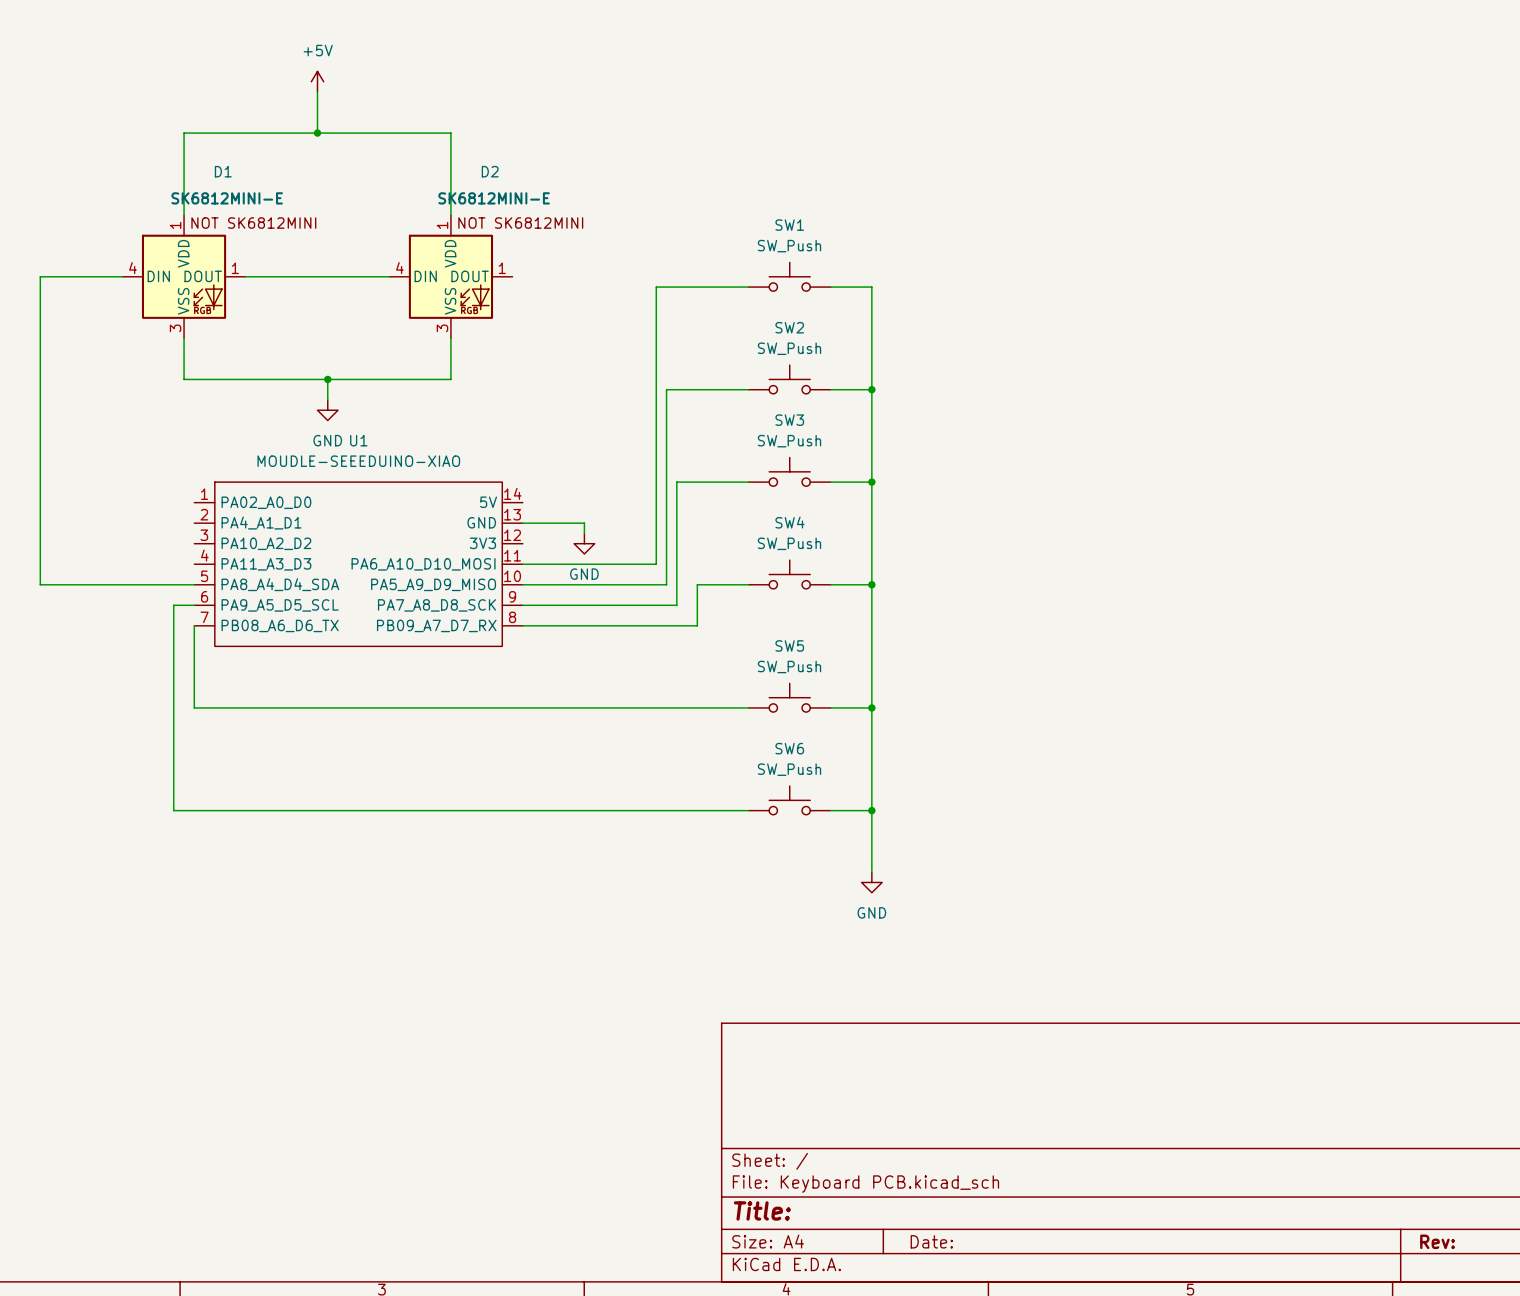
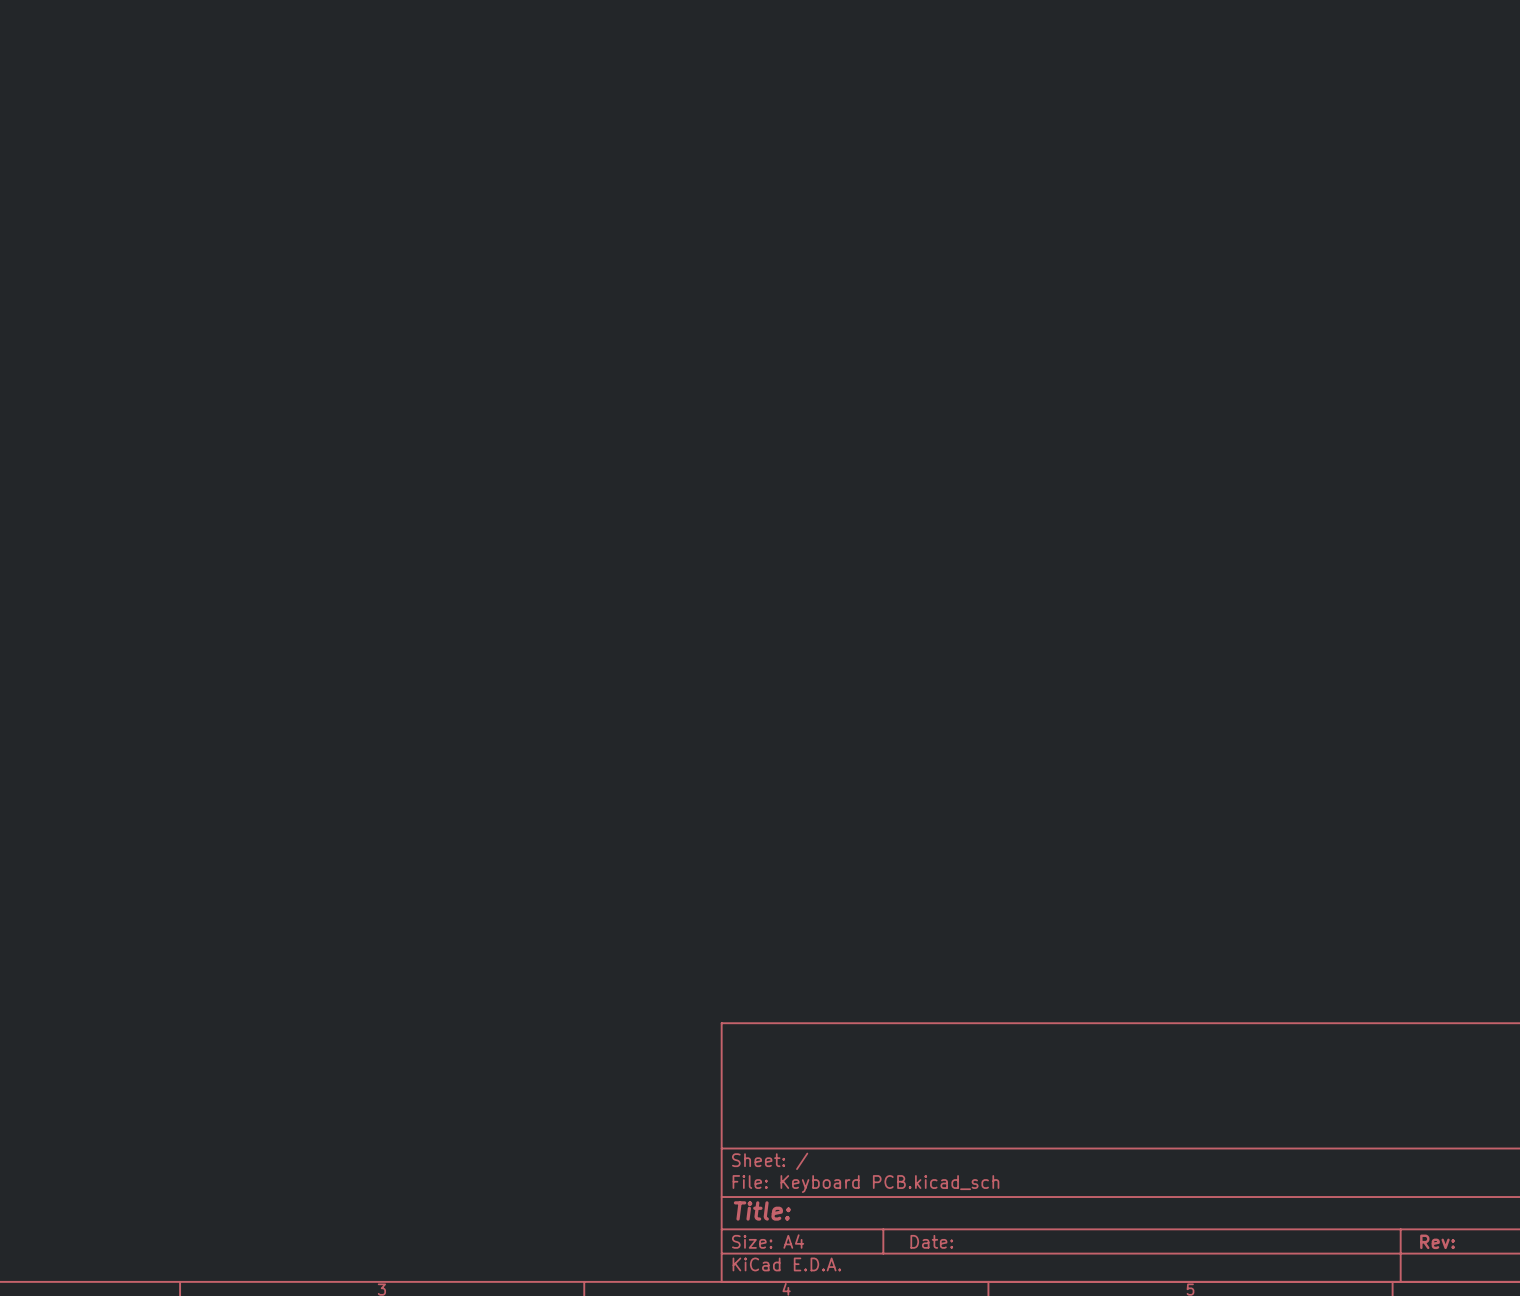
power symbol: +5V (317, 81) -> none
wire: (317, 92) (317, 133) -> none
junction: (317, 133) -> none
wire: (184, 215) (184, 133) (450, 133) (450, 215) -> none
wire: (122, 276) (40, 276) (40, 584) (194, 584) -> none
D1: SK6812MINI-E (184, 276) -> none
wire: (245, 276) (389, 276) -> none
D2: SK6812MINI-E (450, 276) -> none
SW1: SW_Push (789, 276) -> none
wire: (748, 287) (656, 287) (656, 564) (522, 564) -> none
wire: (830, 287) (871, 287) (871, 872) -> none
wire: (184, 338) (184, 379) (450, 379) (450, 338) -> none
wire: (327, 379) (327, 399) -> none
junction: (327, 379) -> none
SW2: SW_Push (789, 379) -> none
wire: (748, 389) (666, 389) (666, 584) (522, 584) -> none
wire: (830, 389) (871, 389) -> none
junction: (871, 389) -> none
power symbol: GND (327, 410) -> none
SW3: SW_Push (789, 471) -> none
wire: (748, 482) (676, 482) (676, 605) (522, 605) -> none
wire: (830, 482) (871, 482) -> none
junction: (871, 482) -> none
wire: (522, 523) (584, 523) (584, 533) -> none
power symbol: GND (584, 543) -> none
U1: MOUDLE-SEEEDUINO-XIAO (358, 564) -> none
SW4: SW_Push (789, 574) -> none
wire: (748, 584) (697, 584) (697, 625) (522, 625) -> none
wire: (830, 584) (871, 584) -> none
junction: (871, 584) -> none
wire: (194, 605) (173, 605) (173, 810) (748, 810) -> none
wire: (194, 625) (194, 707) (748, 707) -> none
SW5: SW_Push (789, 697) -> none
wire: (830, 707) (871, 707) -> none
junction: (871, 707) -> none
SW6: SW_Push (789, 800) -> none
wire: (830, 810) (871, 810) -> none
junction: (871, 810) -> none
power symbol: GND (871, 882) -> none

